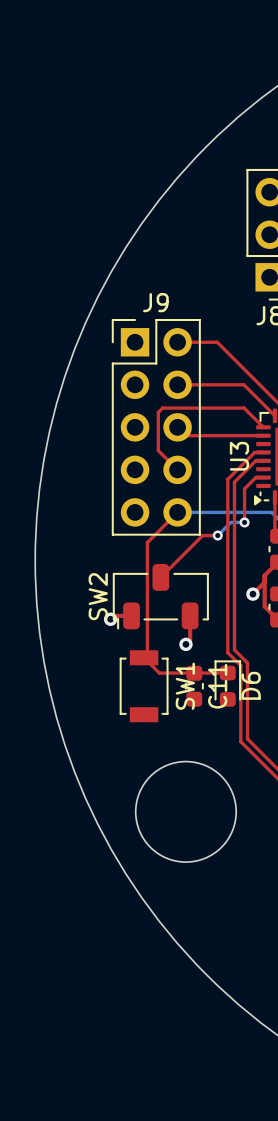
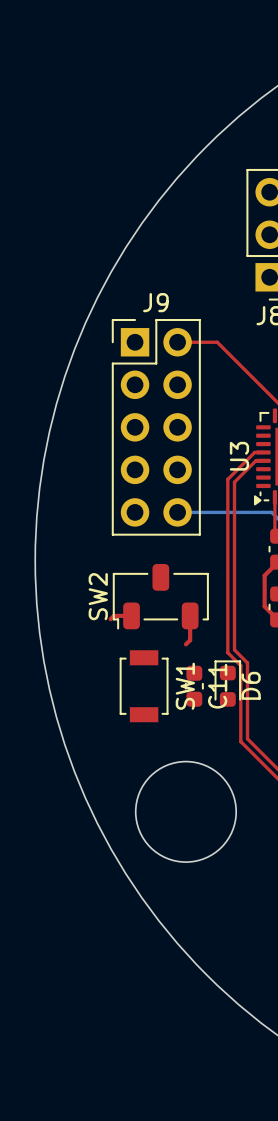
top track: (177, 384) (243, 384) (274, 415) -> none
top track: (177, 427) (185, 435) (263, 435) -> none
top track: (263, 427) (244, 408) (162, 408) (158, 412) (158, 450) (177, 469) -> none
top track: (263, 477) (255, 477) (244, 488) (244, 522) -> none
top track: (177, 512) (147, 542) (147, 654) (144, 657) (159, 673) (227, 673) -> none
bottom track: (244, 522) (230, 522) (217, 535) -> none
via: (244, 522) -> none
top track: (217, 535) (202, 535) (160, 577) -> none
via: (217, 535) -> none
top track: (264, 582) (252, 594) -> none
via: (252, 594) -> none
via: (110, 619) -> none
via: (185, 644) -> none

